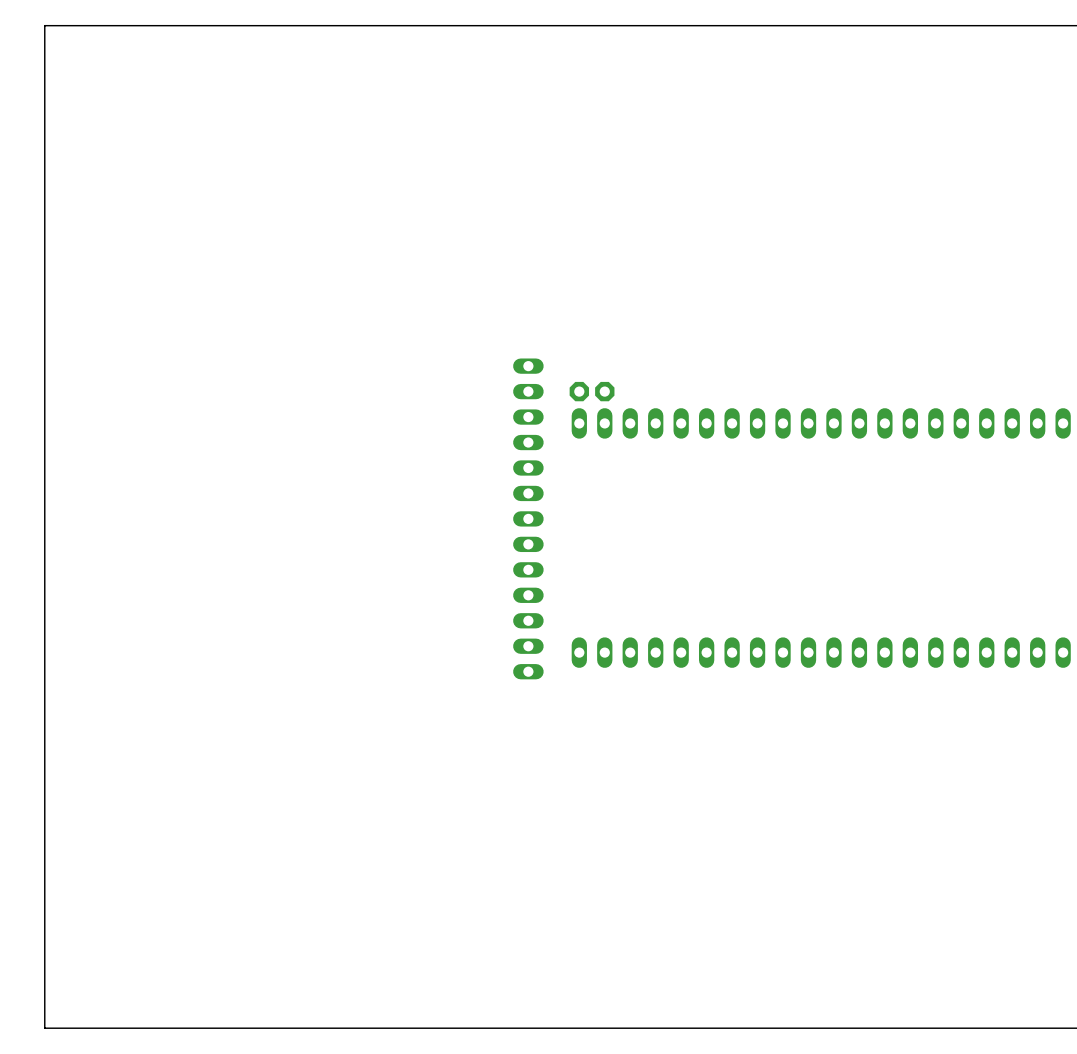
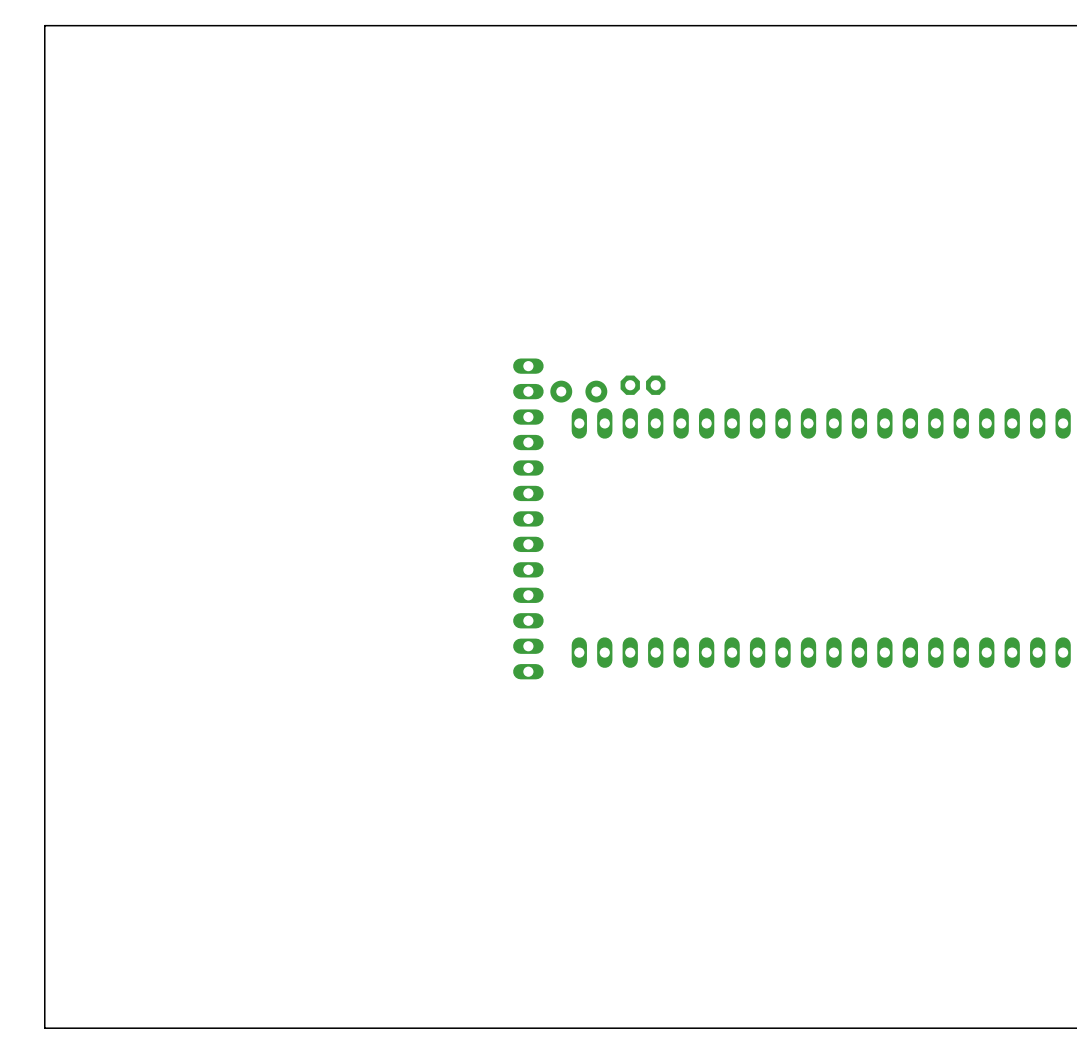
part footprint: [569, 381, 589, 402] -> [550, 380, 608, 403]
part: none -> (630, 385)
part: none -> (655, 385)
part: (604, 391) -> none

